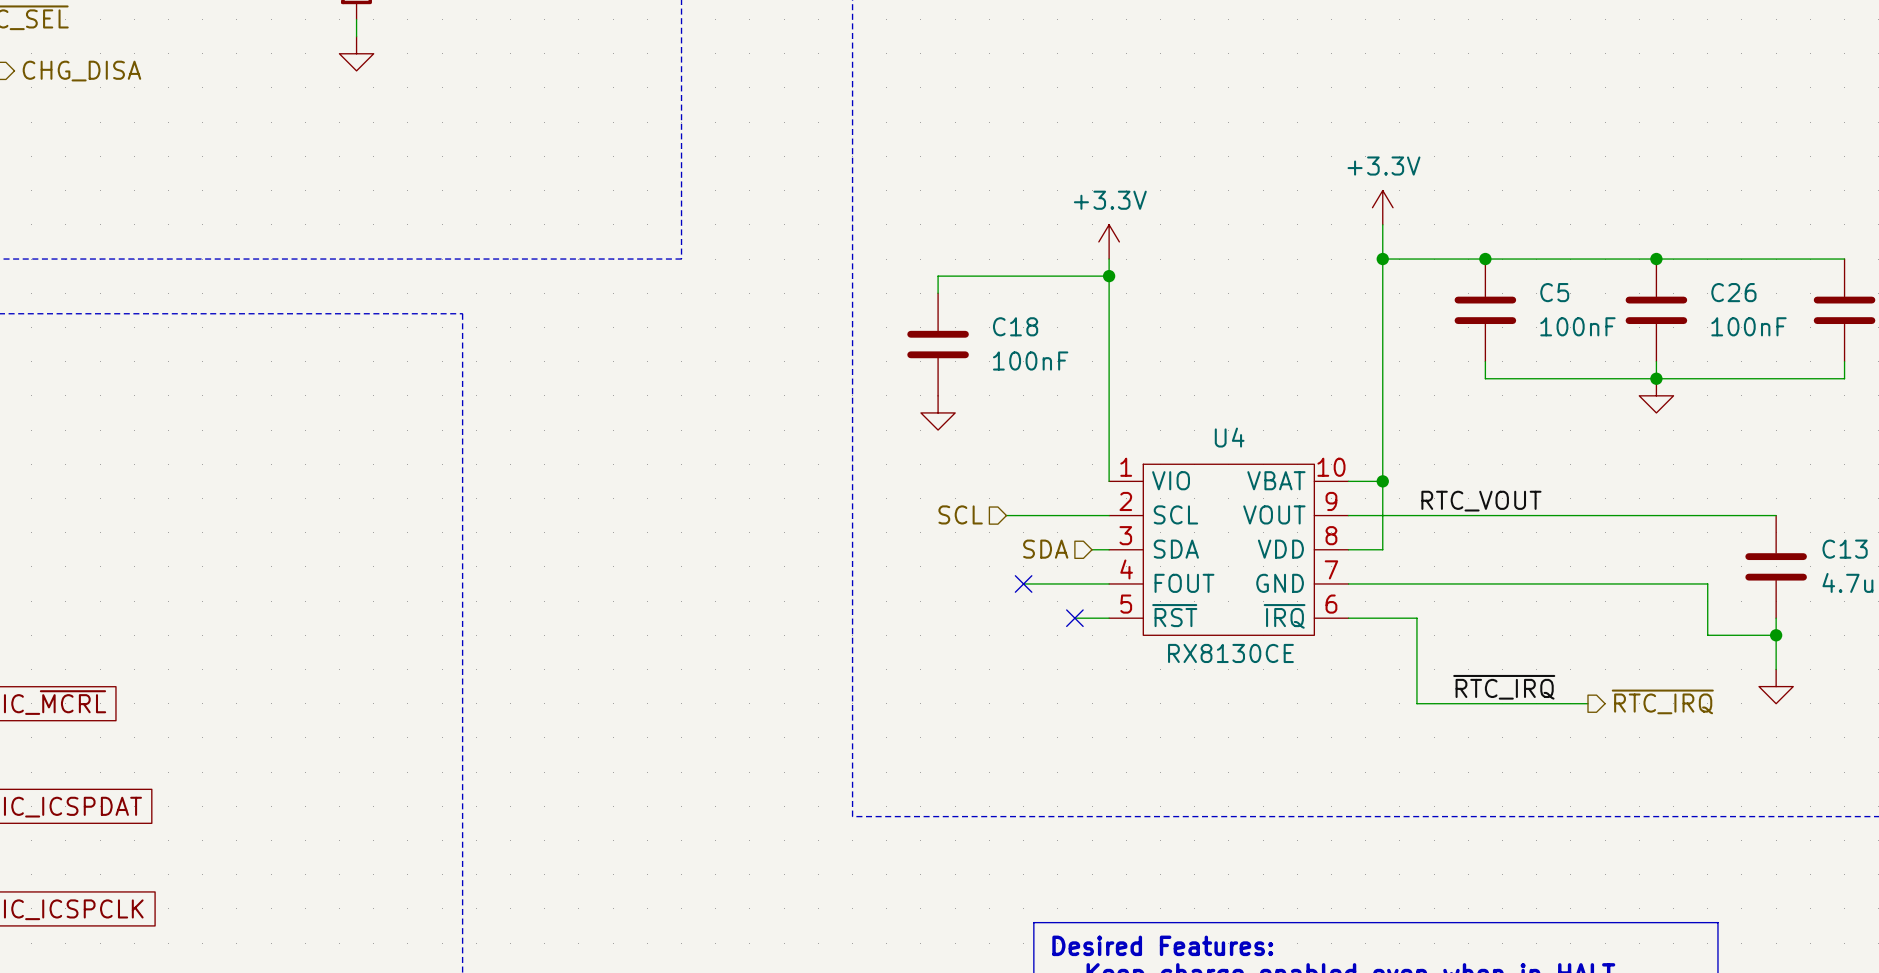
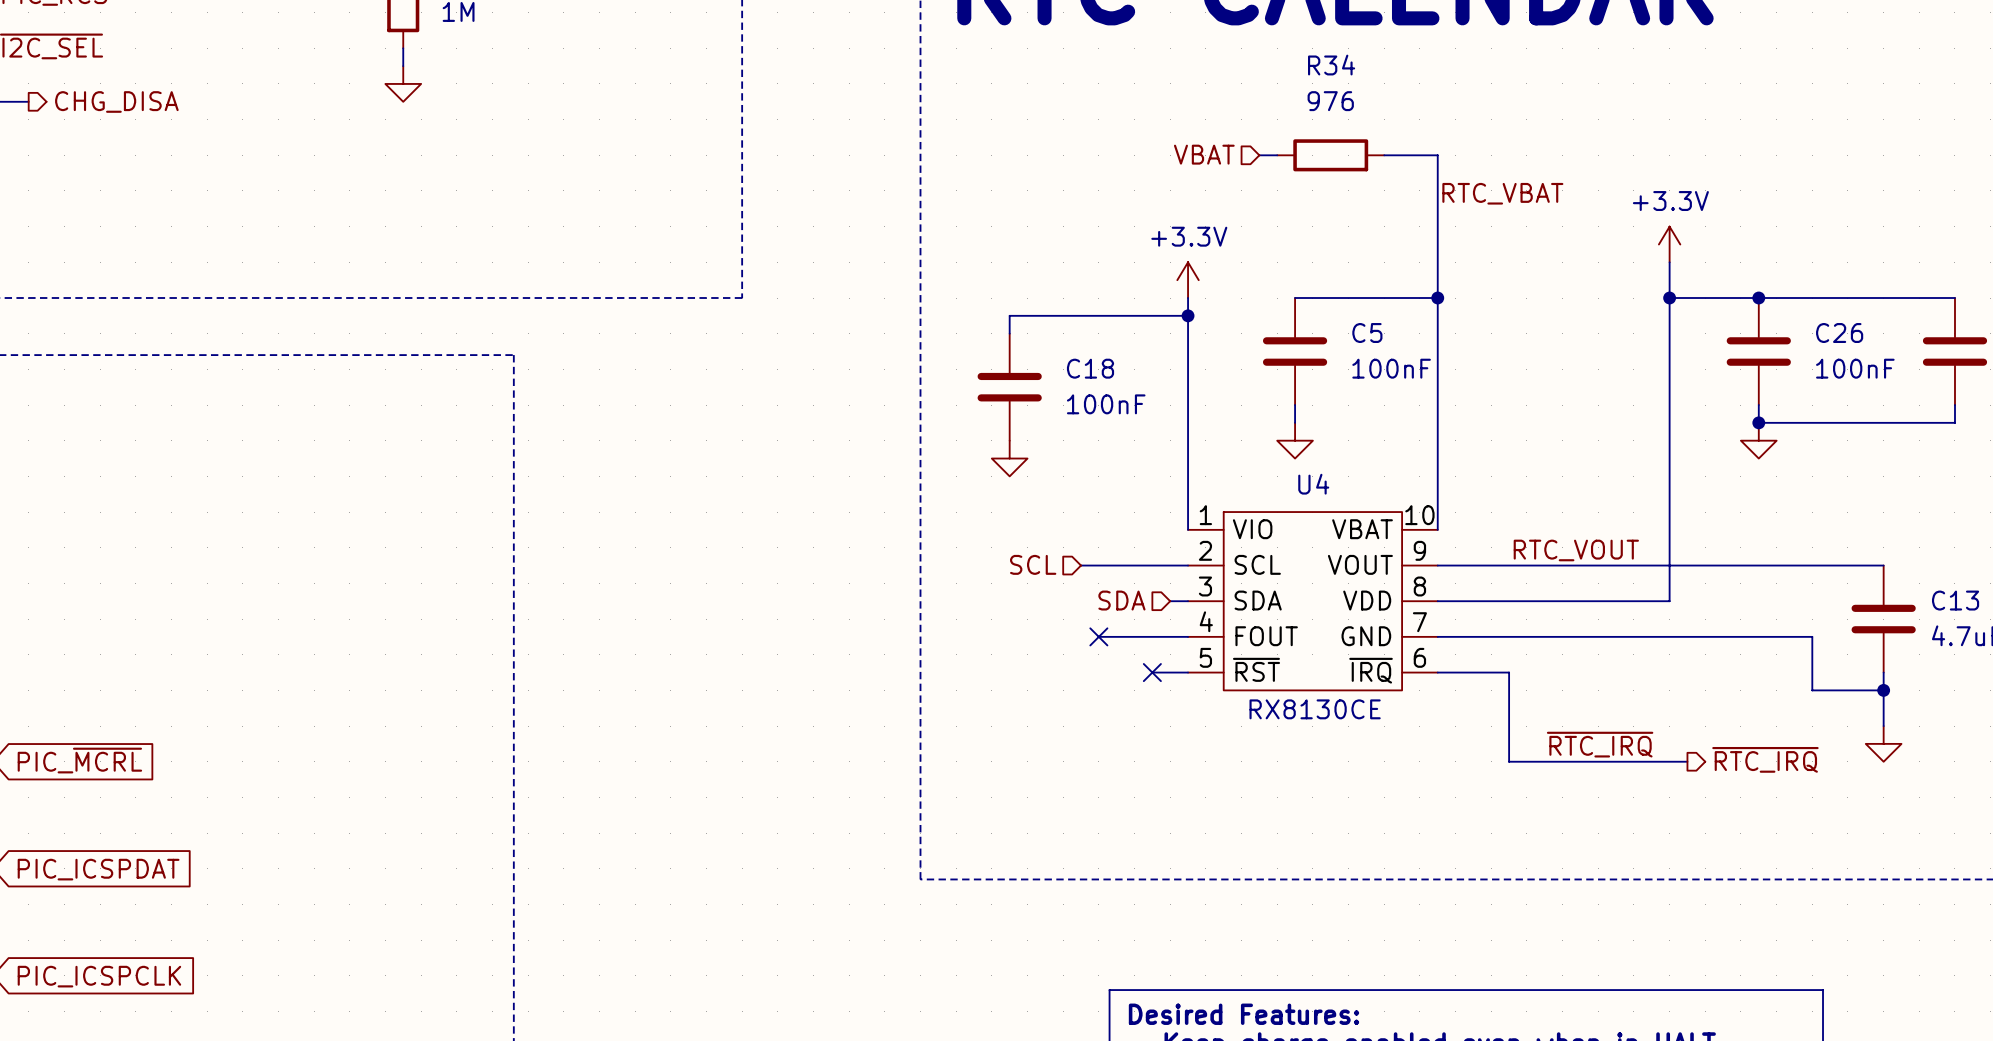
hierarchical label: none -> VBAT (1204, 154)
wire: none -> (1259, 155) (1277, 155)
R34: none -> 976 (1330, 155)
label: none -> RTC_VBAT (1502, 193)
power symbol position: +3.3V (1382, 207) -> +3.3V (1669, 244)
wire: (1382, 224) (1382, 549) -> (1669, 262) (1669, 601) (1473, 601)
wire: none -> (1295, 298) (1437, 298)
wire: (1382, 259) (1570, 259) -> none
junction position: (1382, 259) -> (1437, 298)
junction: (1485, 259) -> none
junction: none -> (1669, 298)
C5 position: (1485, 310) -> (1295, 351)
wire: none -> (1295, 405) (1295, 422)
wire: (1485, 361) (1485, 378) (1656, 378) -> none
power symbol: none -> (1295, 440)
wire: (1348, 481) (1382, 481) -> (1437, 529) (1437, 155) (1384, 155)
junction: (1382, 481) -> none

